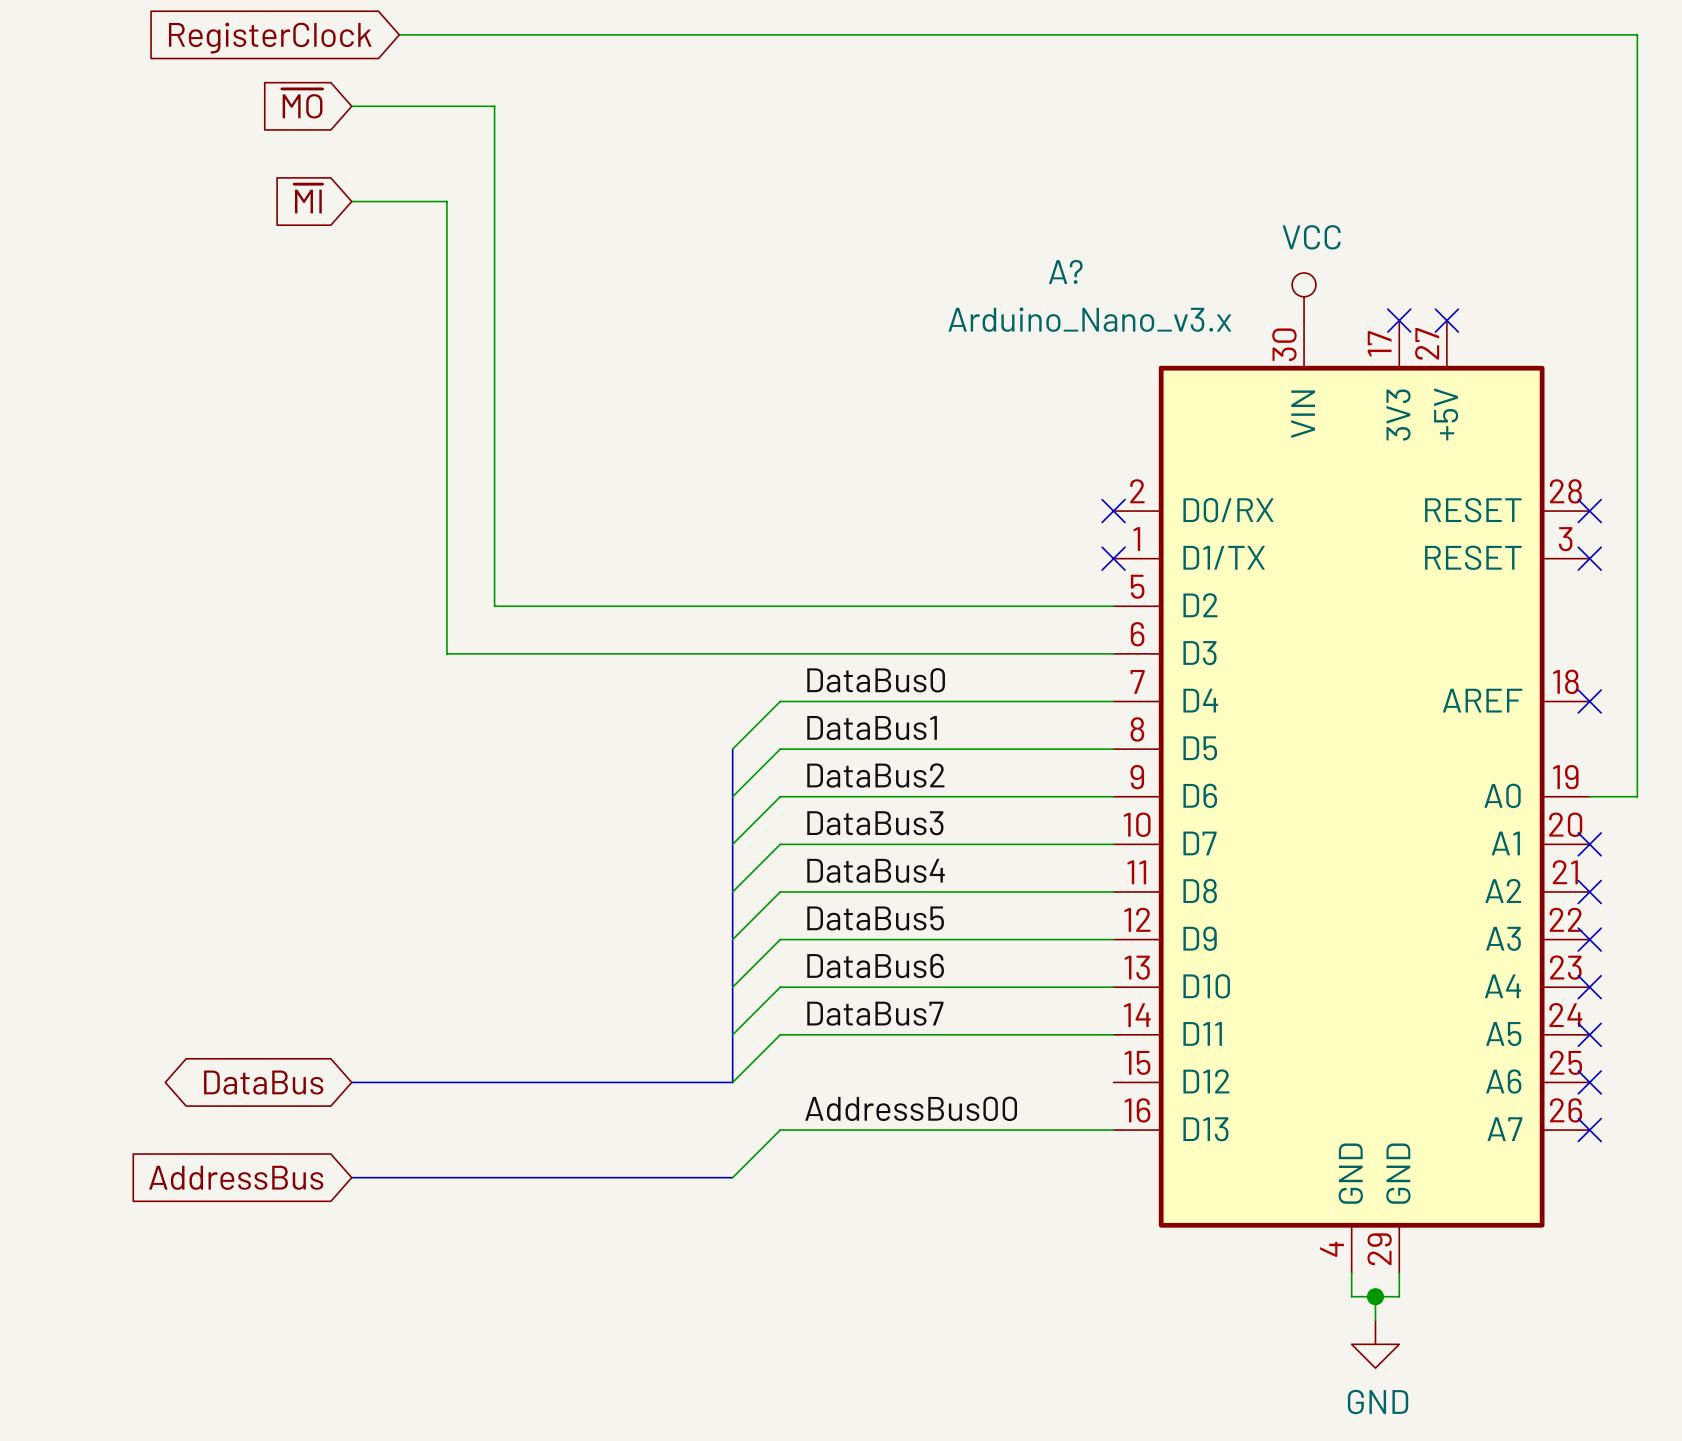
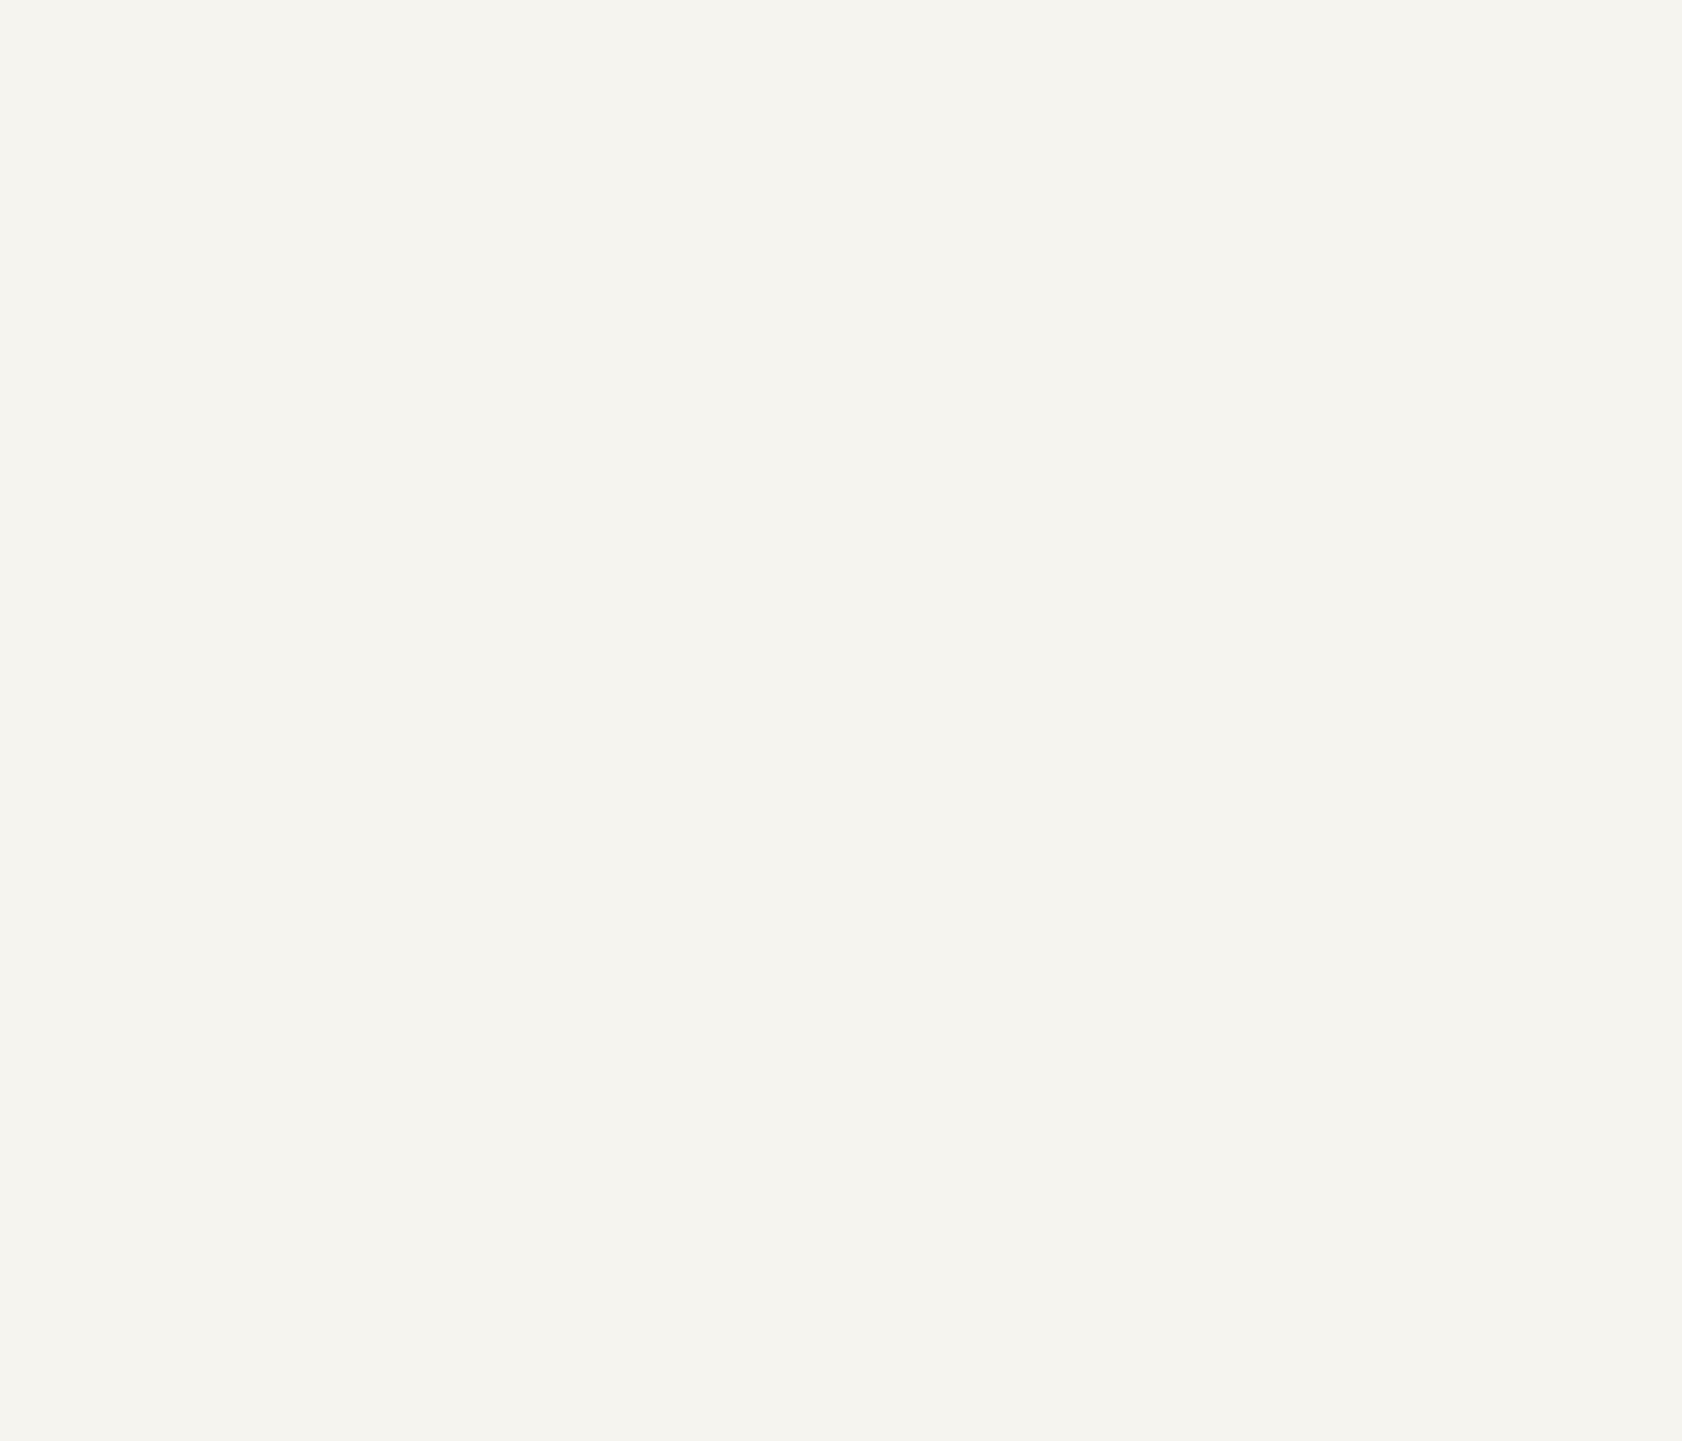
wire: (399, 34) (1637, 34) (1637, 796) (1589, 796) -> none
global label: RegisterClock (270, 38) -> none
global label: ~{MO} (302, 103) -> none
wire: (351, 106) (494, 106) (494, 606) (1113, 606) -> none
global label: ~{MI} (308, 198) -> none
wire: (351, 201) (446, 201) (446, 653) (1113, 653) -> none
power symbol: VCC (1304, 296) -> none
no-connect mark: (1399, 320) -> none
no-connect mark: (1446, 320) -> none
no-connect mark: (1113, 511) -> none
no-connect mark: (1589, 511) -> none
no-connect mark: (1113, 558) -> none
no-connect mark: (1589, 558) -> none
label: DataBus0 (876, 680) -> none
wire: (1113, 701) (780, 701) (732, 749) -> none
no-connect mark: (1589, 701) -> none
label: DataBus1 (872, 728) -> none
bus: (732, 749) (732, 1082) (351, 1082) -> none
wire: (1113, 749) (780, 749) (732, 796) -> none
label: DataBus2 (875, 775) -> none
wire: (1113, 796) (780, 796) (732, 844) -> none
A?: Arduino_Nano_v3.x (1351, 796) -> none
label: DataBus3 (875, 823) -> none
wire: (1113, 844) (780, 844) (732, 891) -> none
no-connect mark: (1589, 844) -> none
label: DataBus4 (876, 870) -> none
wire: (1113, 891) (780, 891) (732, 939) -> none
no-connect mark: (1589, 891) -> none
label: DataBus5 (875, 918) -> none
wire: (1113, 939) (780, 939) (732, 987) -> none
no-connect mark: (1589, 939) -> none
label: DataBus6 (875, 965) -> none
wire: (1113, 987) (780, 987) (732, 1034) -> none
no-connect mark: (1589, 987) -> none
label: DataBus7 (875, 1013) -> none
wire: (1113, 1034) (780, 1034) (732, 1082) -> none
no-connect mark: (1589, 1034) -> none
global label: DataBus (263, 1082) -> none
no-connect mark: (1589, 1082) -> none
label: AddressBus00 (911, 1108) -> none
wire: (1113, 1130) (780, 1130) (732, 1177) -> none
no-connect mark: (1589, 1130) -> none
global label: AddressBus (236, 1177) -> none
bus: (351, 1177) (732, 1177) -> none
wire: (1351, 1272) (1351, 1296) (1399, 1296) (1399, 1272) -> none
wire: (1375, 1296) (1375, 1320) -> none
junction: (1375, 1296) -> none
power symbol: GND (1375, 1344) -> none

